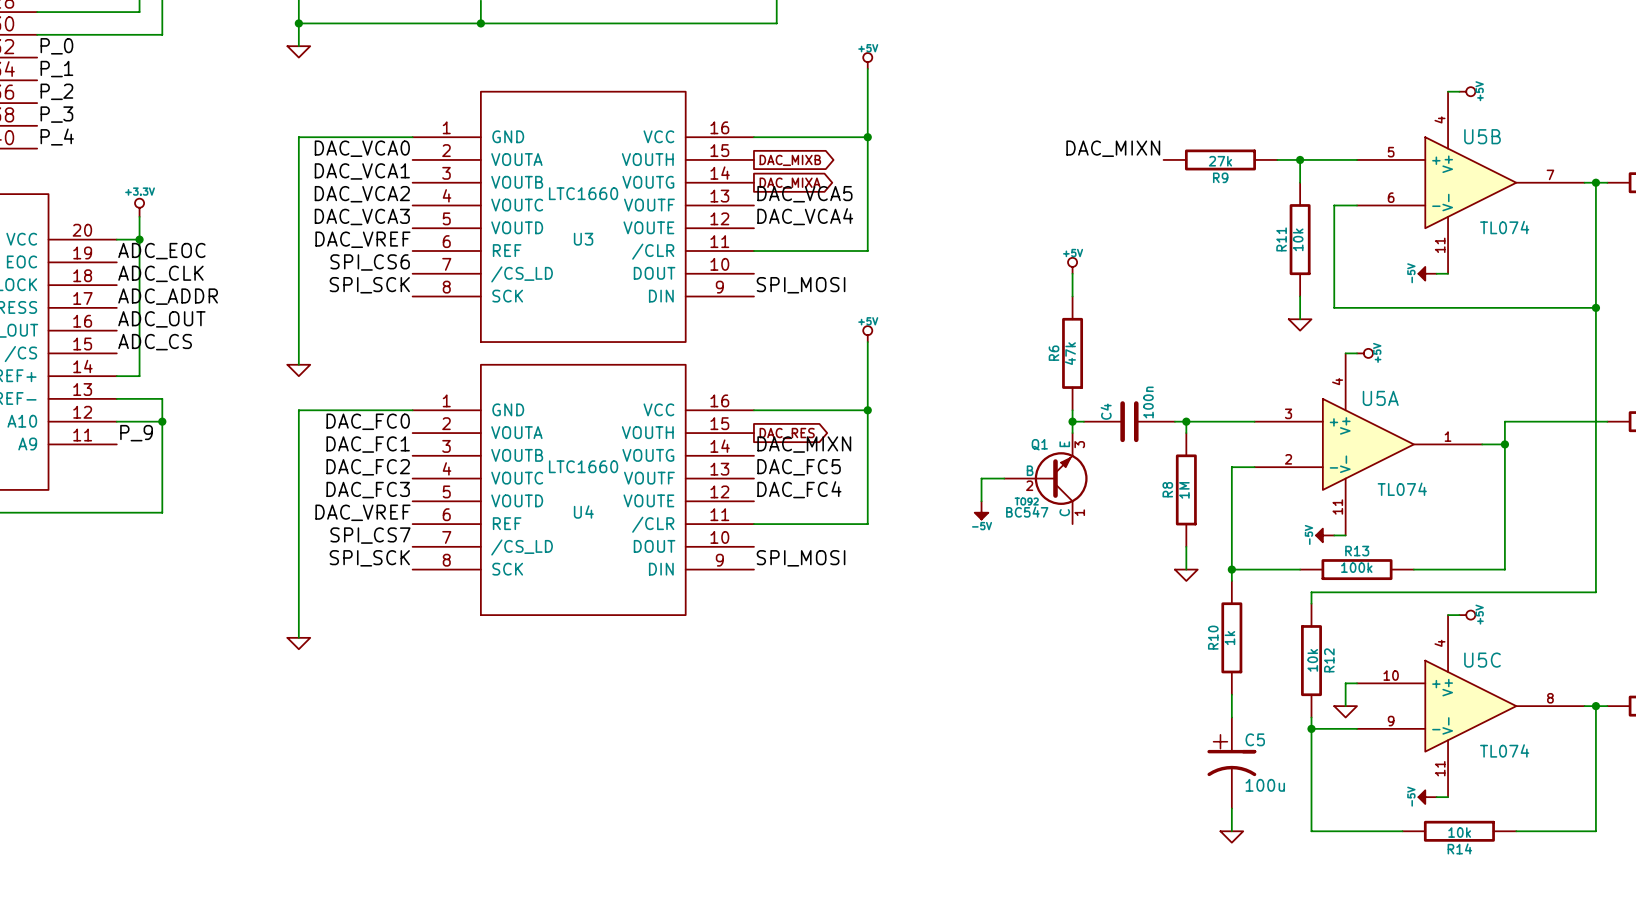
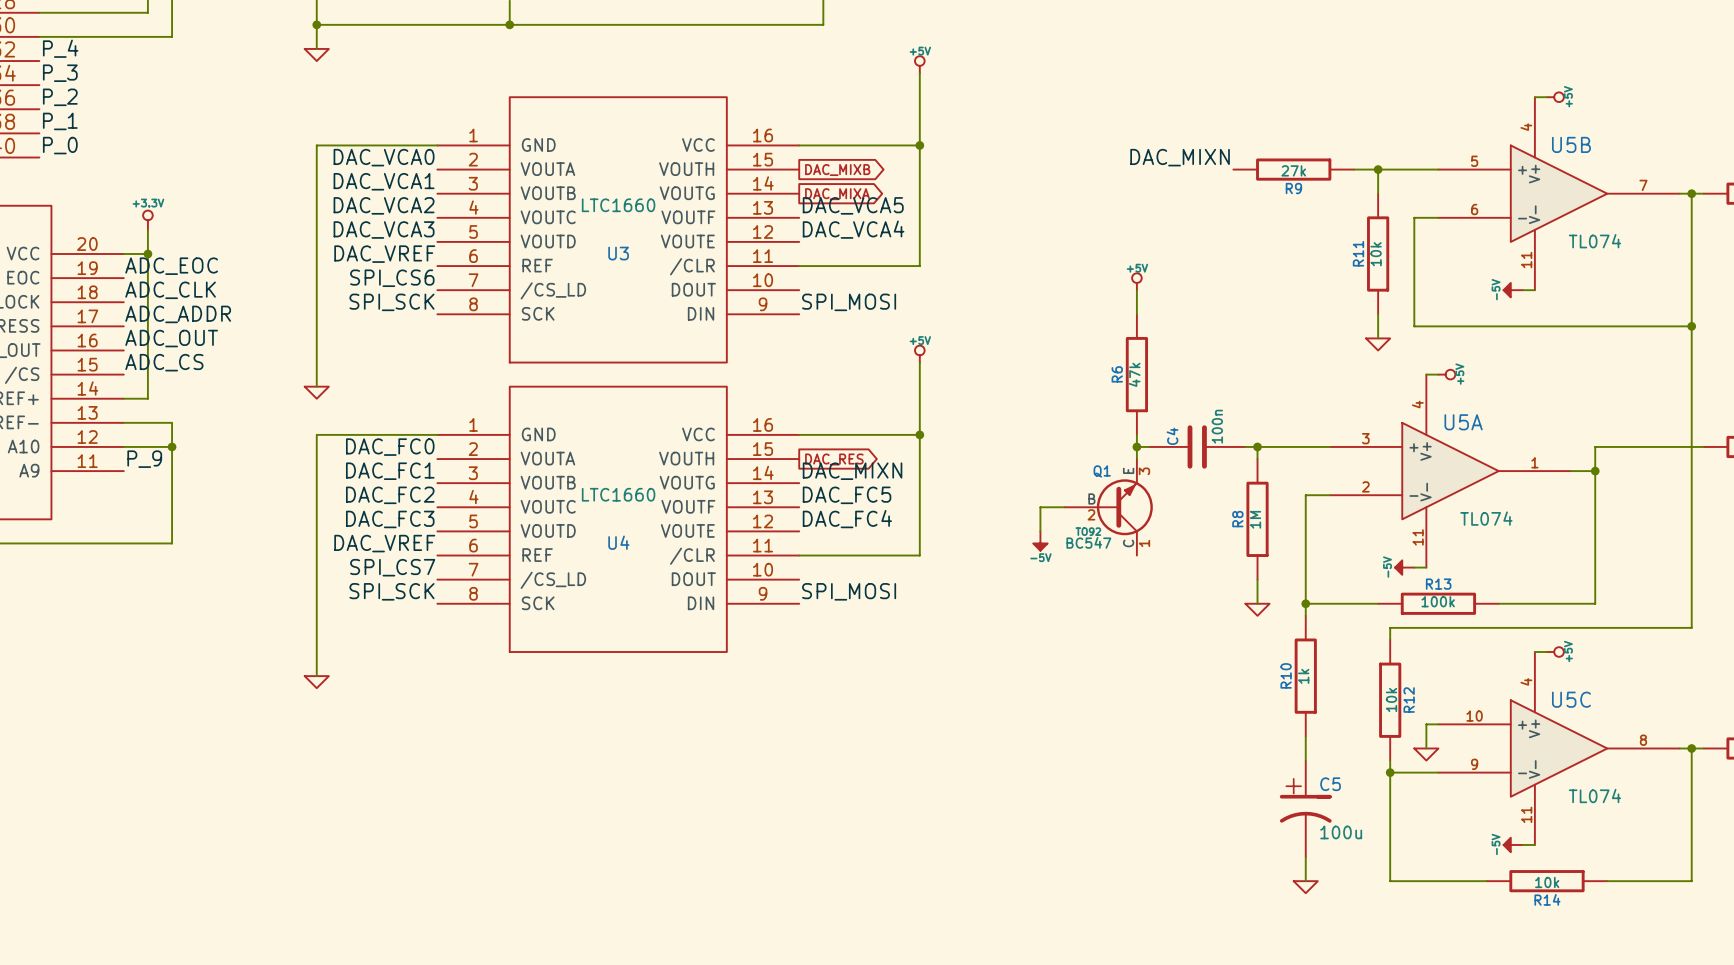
label: P_0 (56, 46) -> P_4 (60, 48)
label: P_1 (56, 69) -> P_3 (60, 73)
label: P_3 (56, 114) -> P_1 (60, 121)
label: P_4 (57, 137) -> P_0 (60, 145)

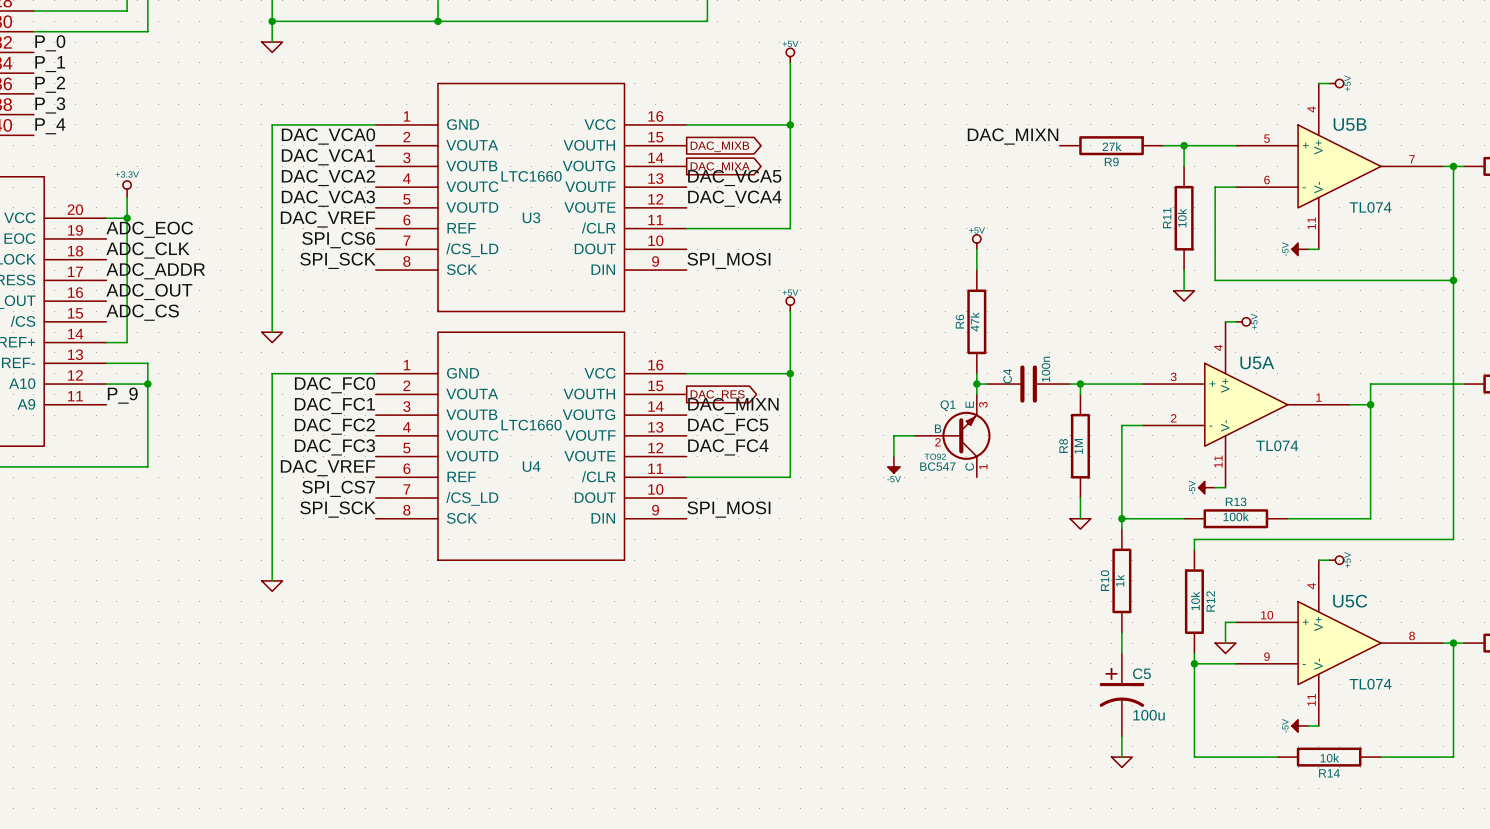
label: P_4 (60, 48) -> P_0 (50, 43)
label: P_3 (60, 73) -> P_1 (50, 64)
label: P_1 (60, 121) -> P_3 (50, 105)
label: P_0 (60, 145) -> P_4 (50, 126)

